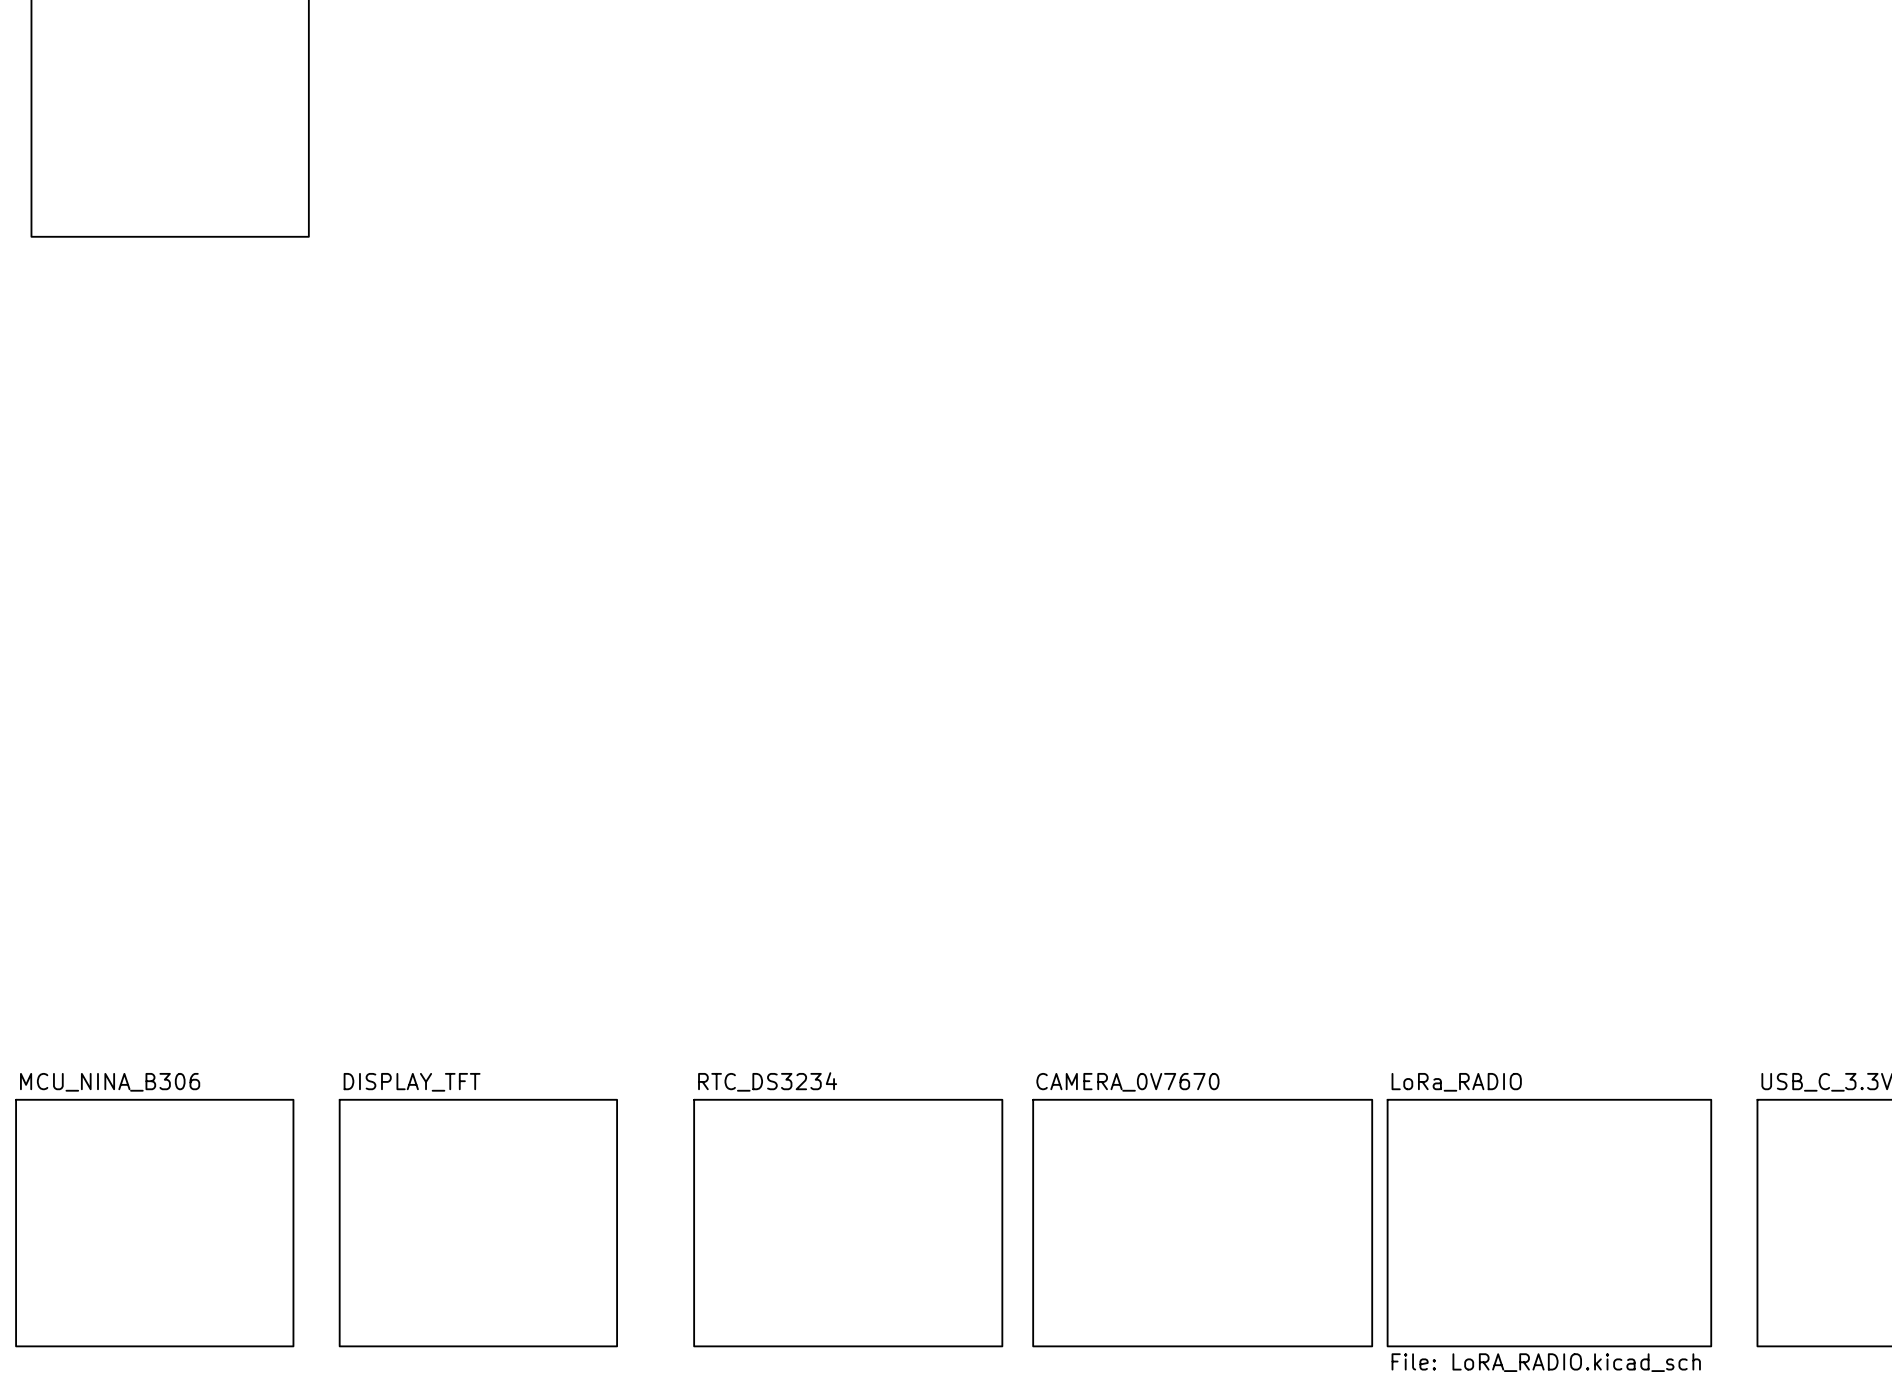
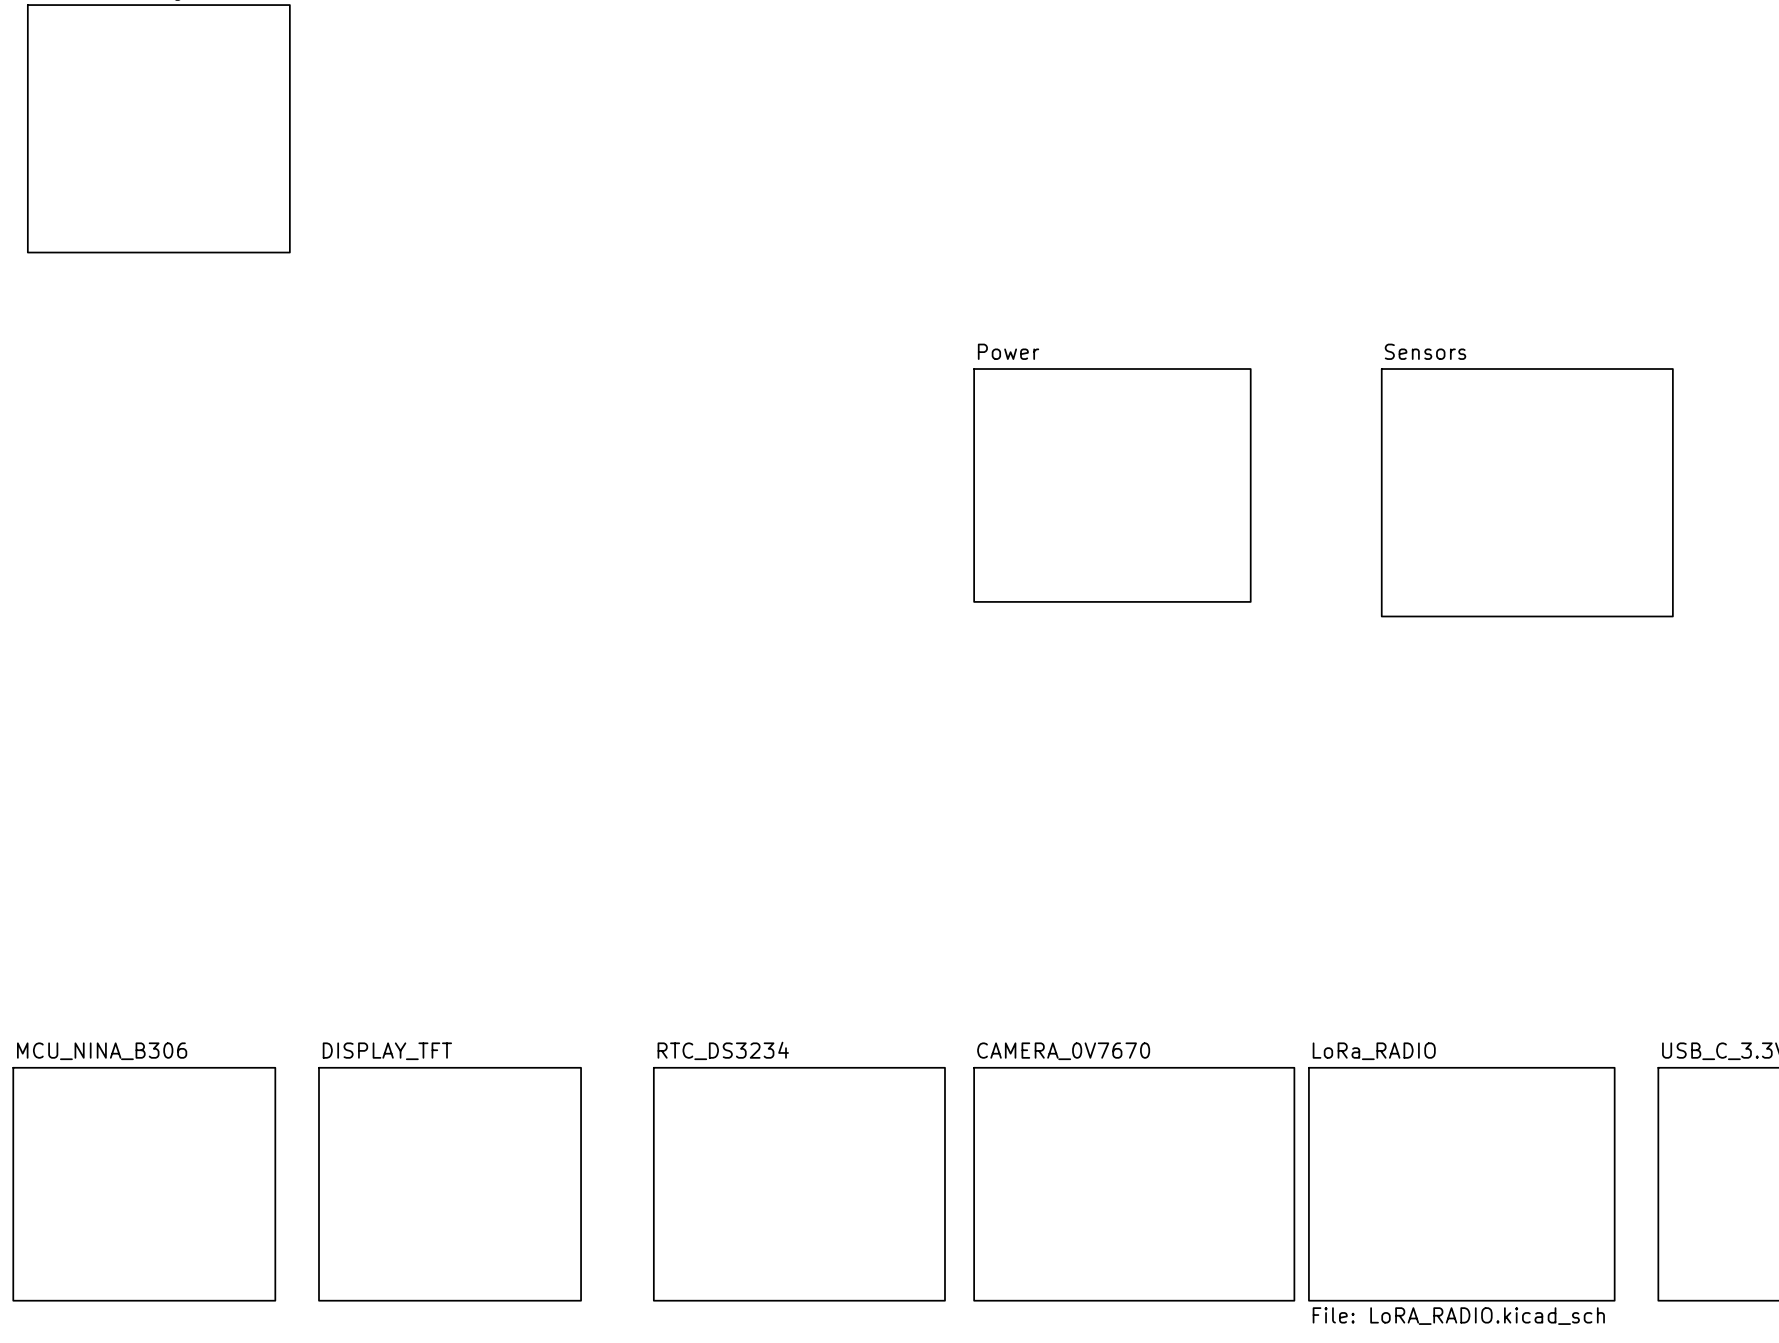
sheet Power: none -> (1112, 485)
sheet Sensors: none -> (1527, 492)

